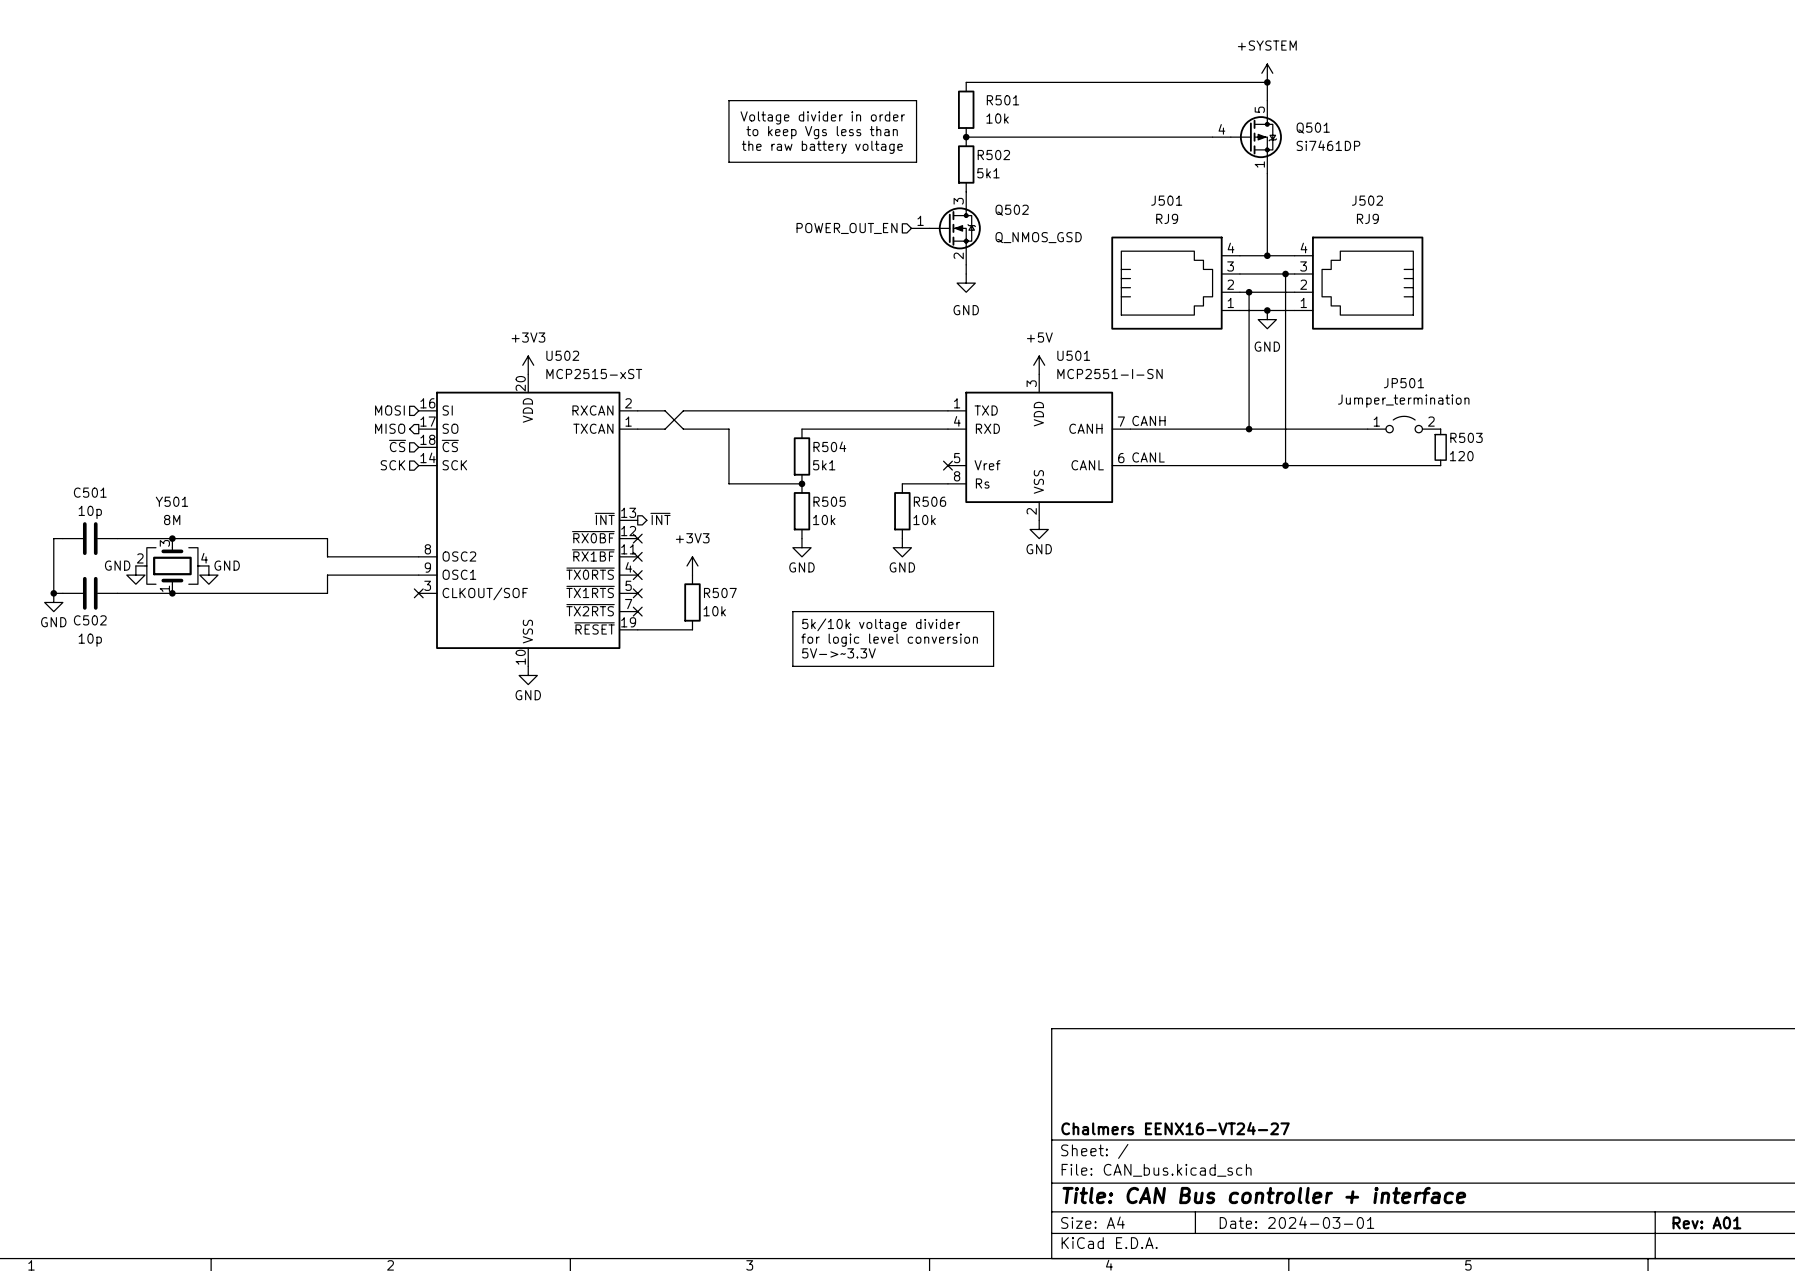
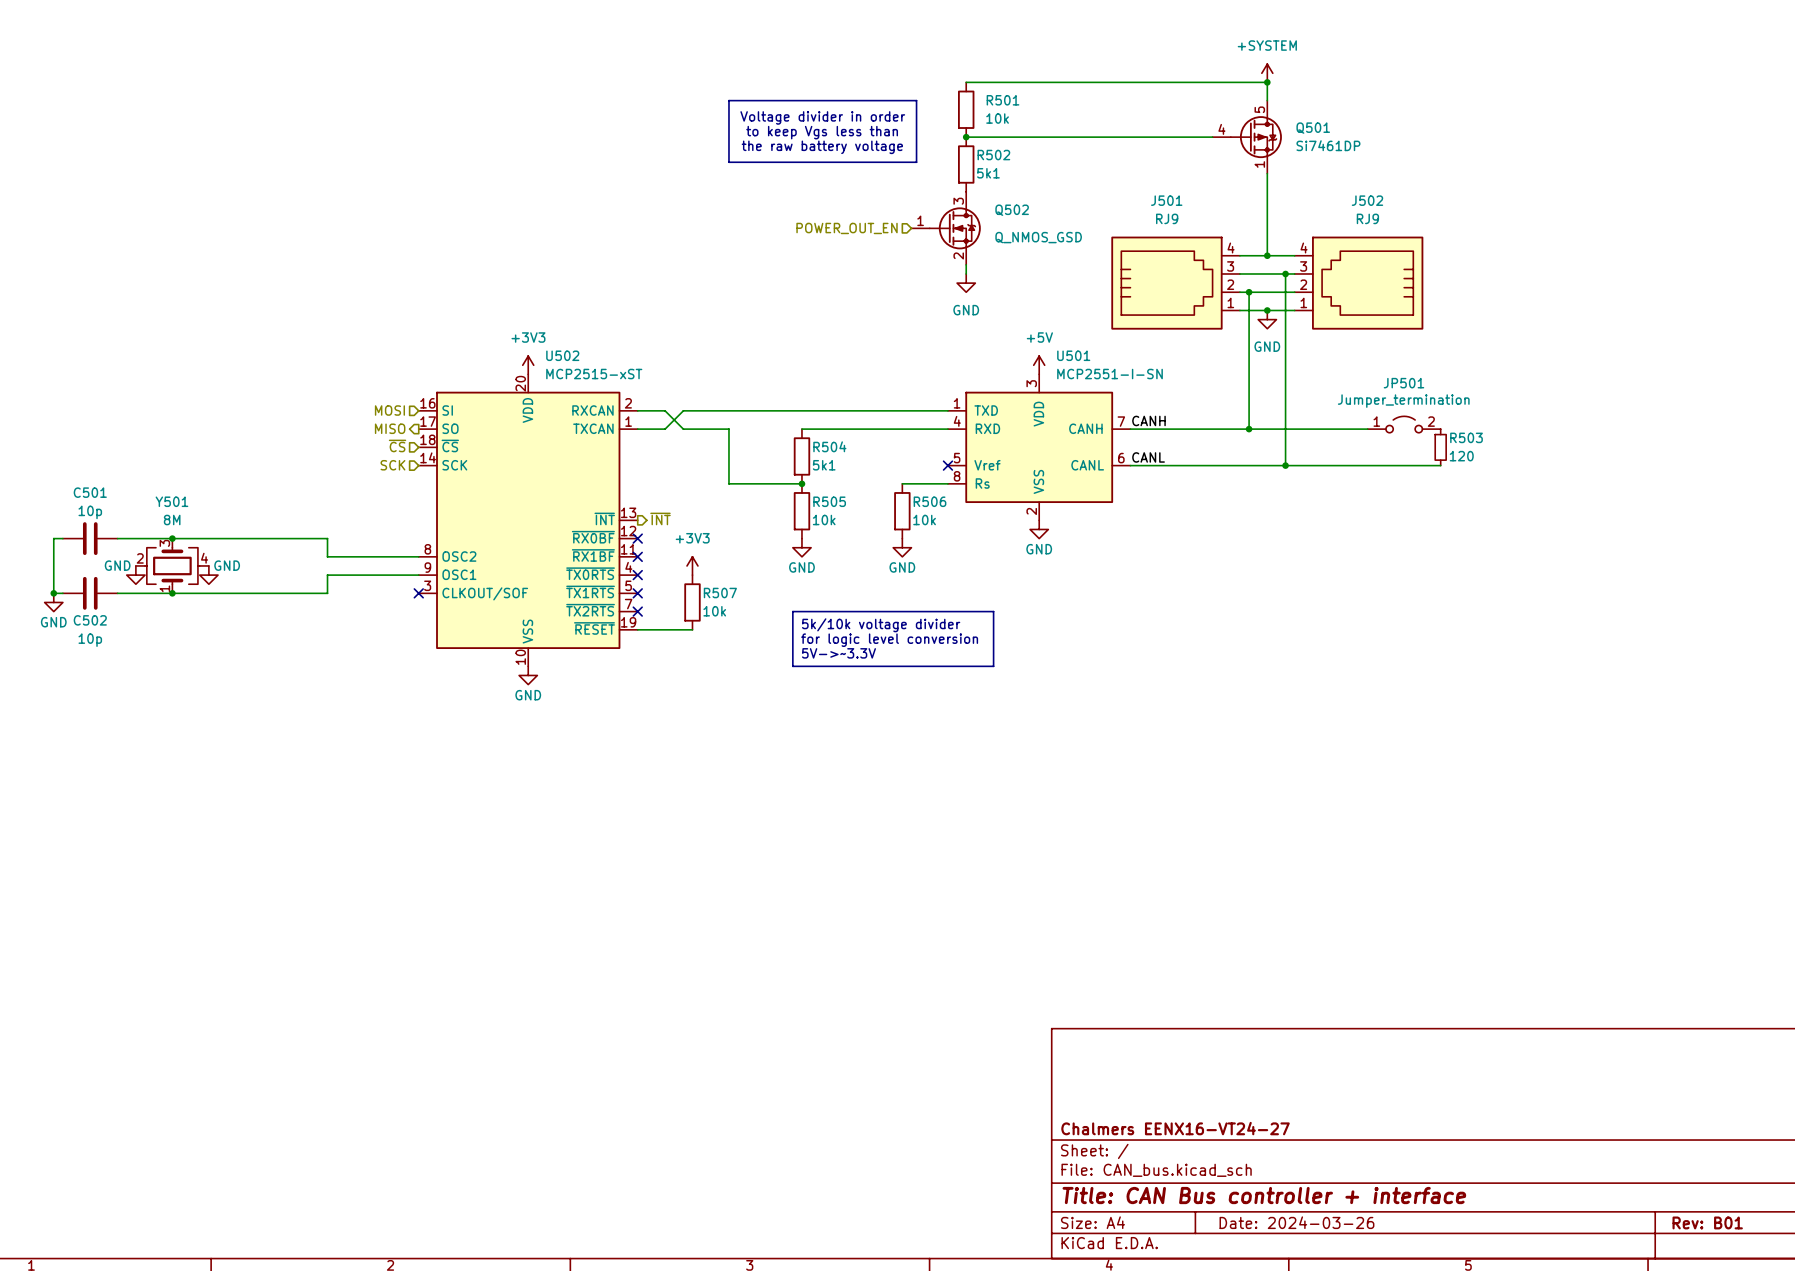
title block: Date: 2024-03-01 (1296, 1222) -> Date: 2024-03-26 (1296, 1222)
title block: Rev: A01 (1706, 1222) -> Rev: B01 (1707, 1222)

